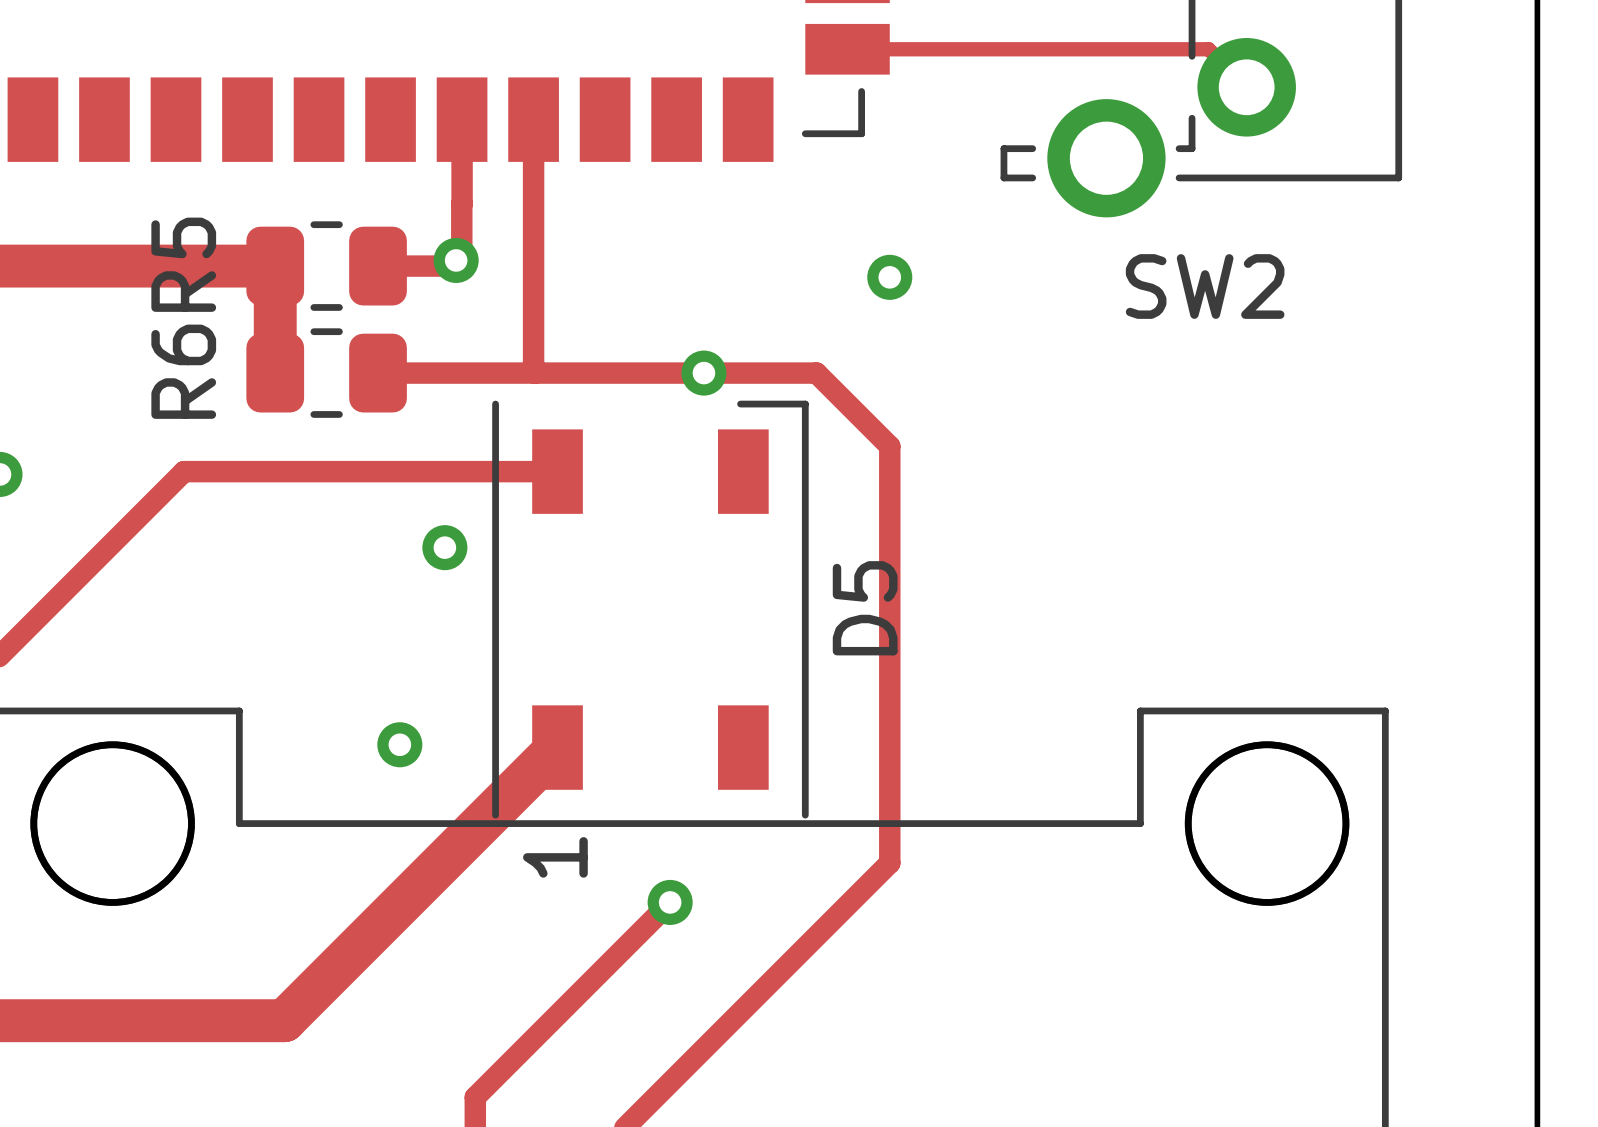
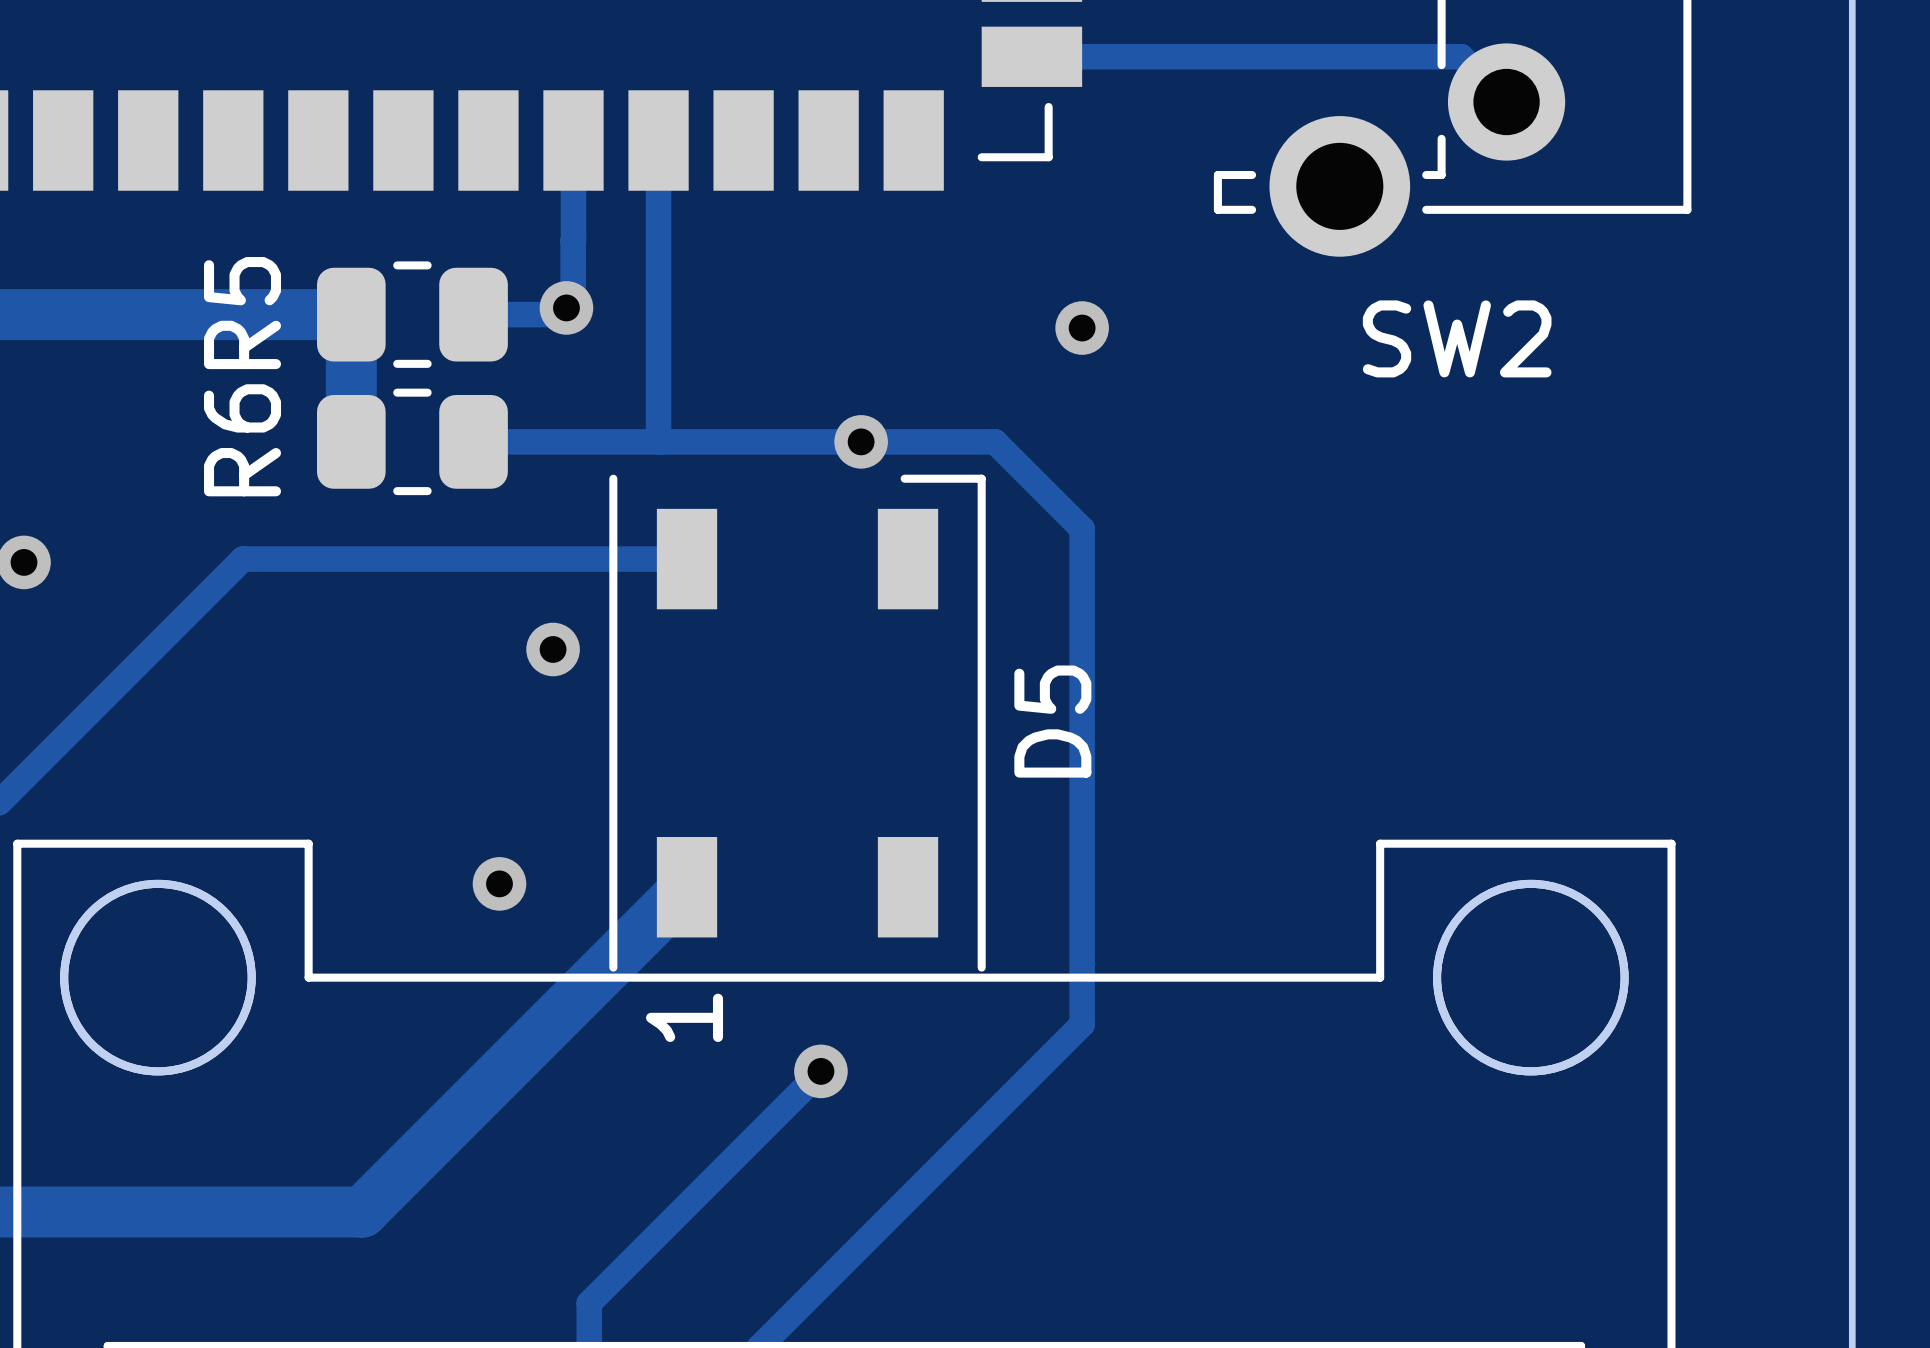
track width: thin (847, 49) (1208, 49) (1246, 87) -> thick (1031, 56) (1461, 56) (1506, 102)

